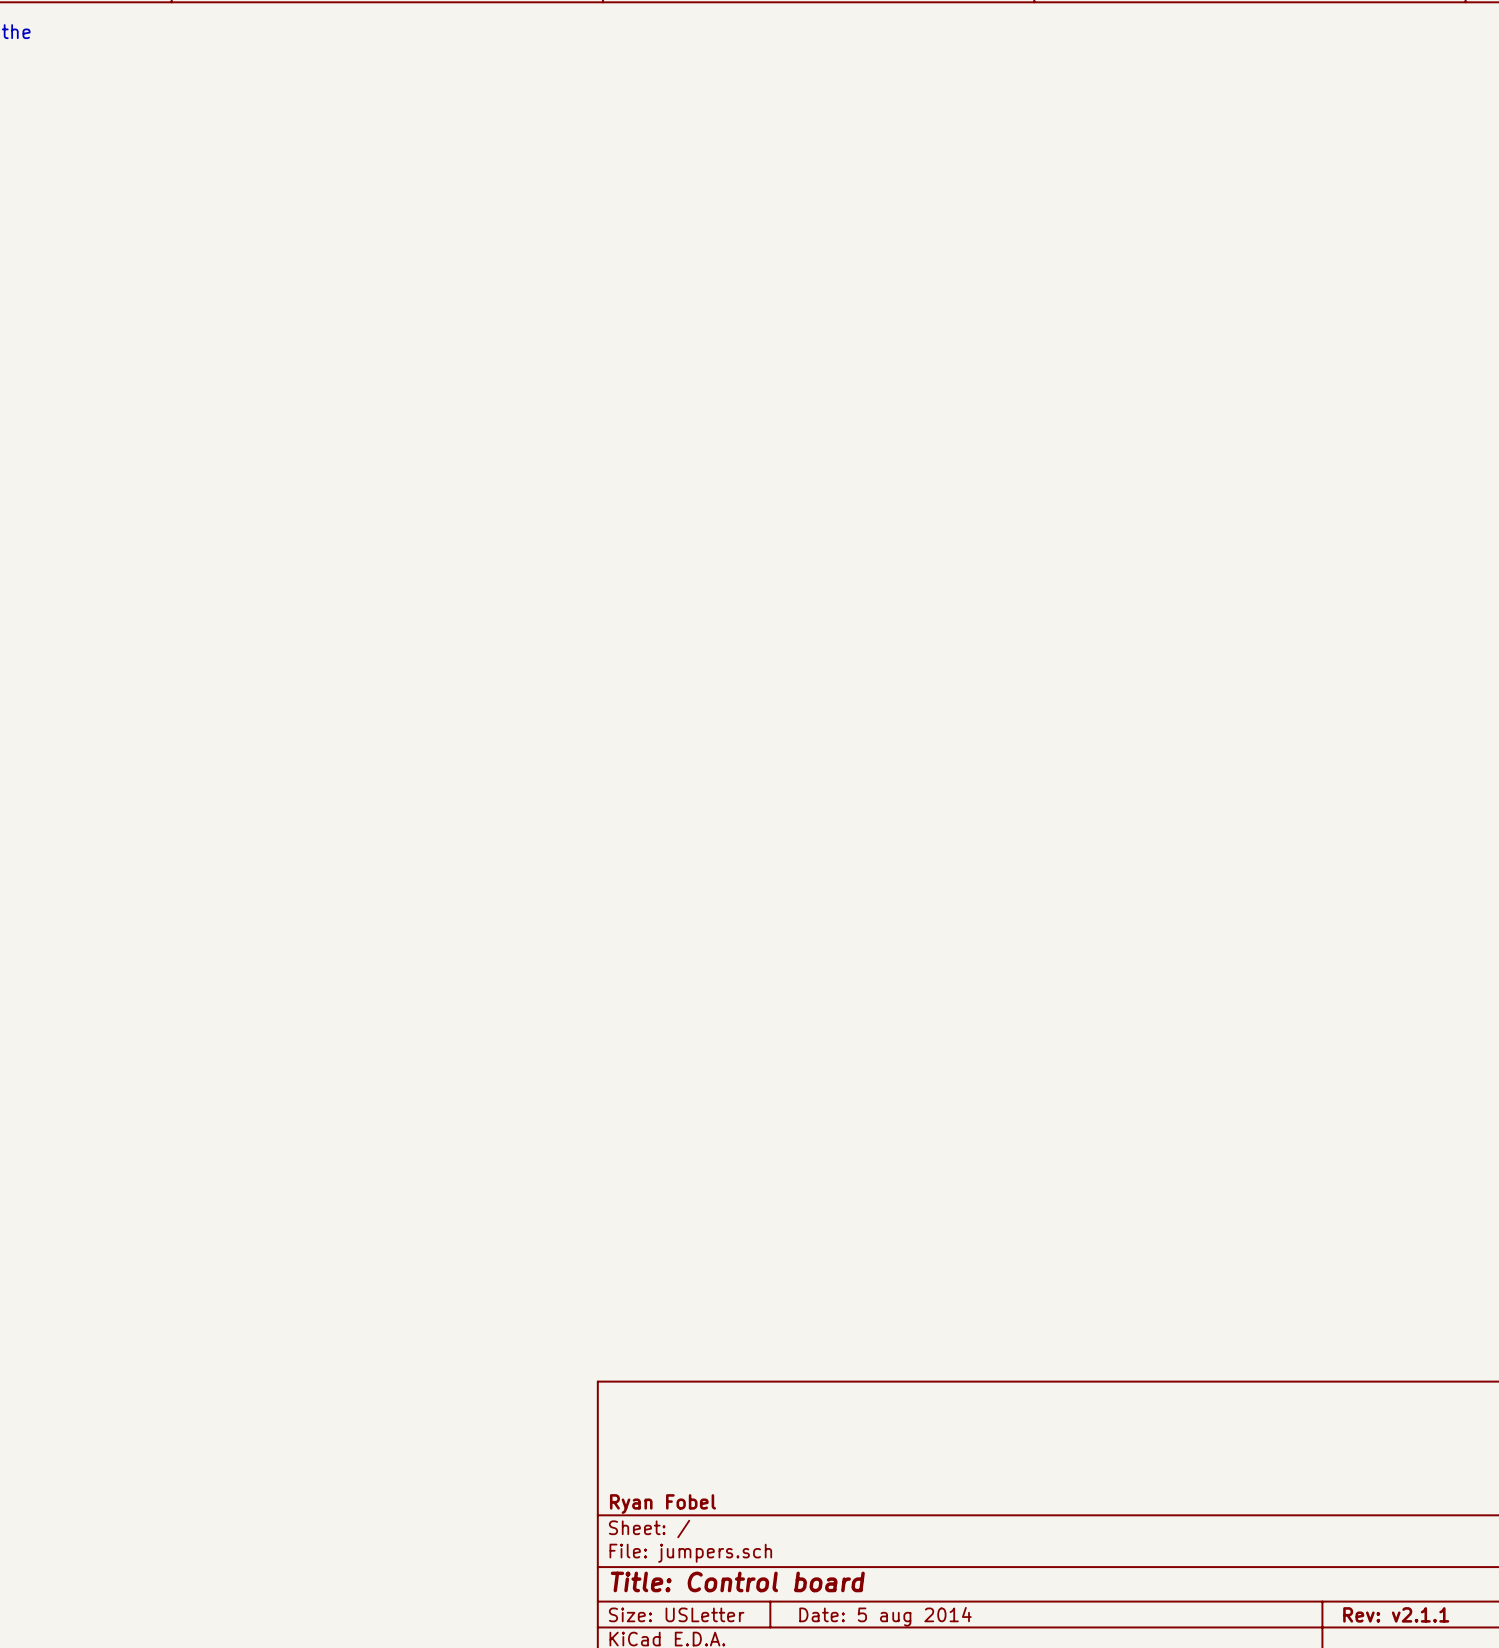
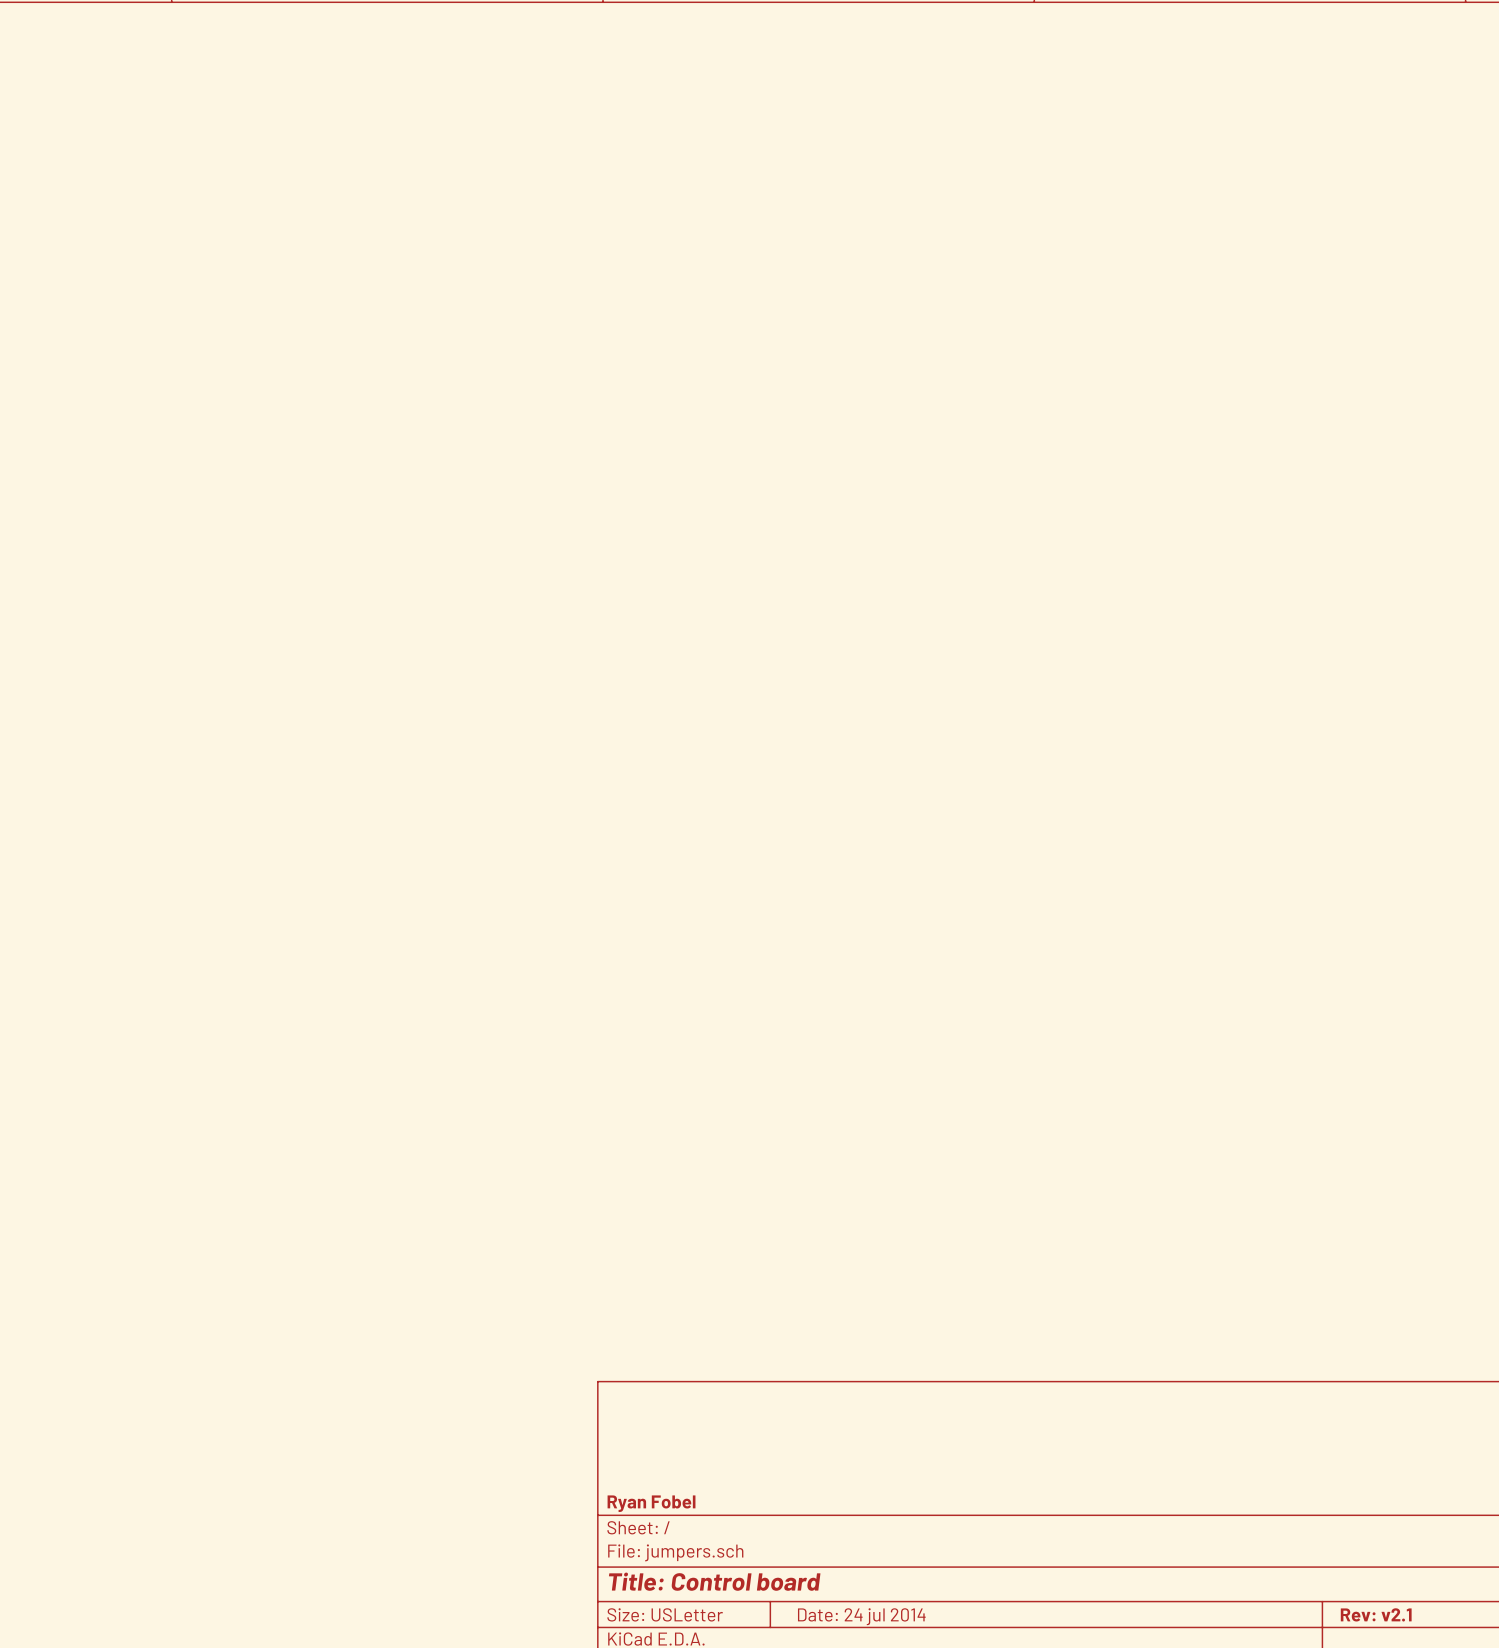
title block: Rev: v2.1.1 (1396, 1614) -> Rev: v2.1 (1376, 1614)
title block: Date: 5 aug 2014 (885, 1616) -> Date: 24 jul 2014 (861, 1616)

